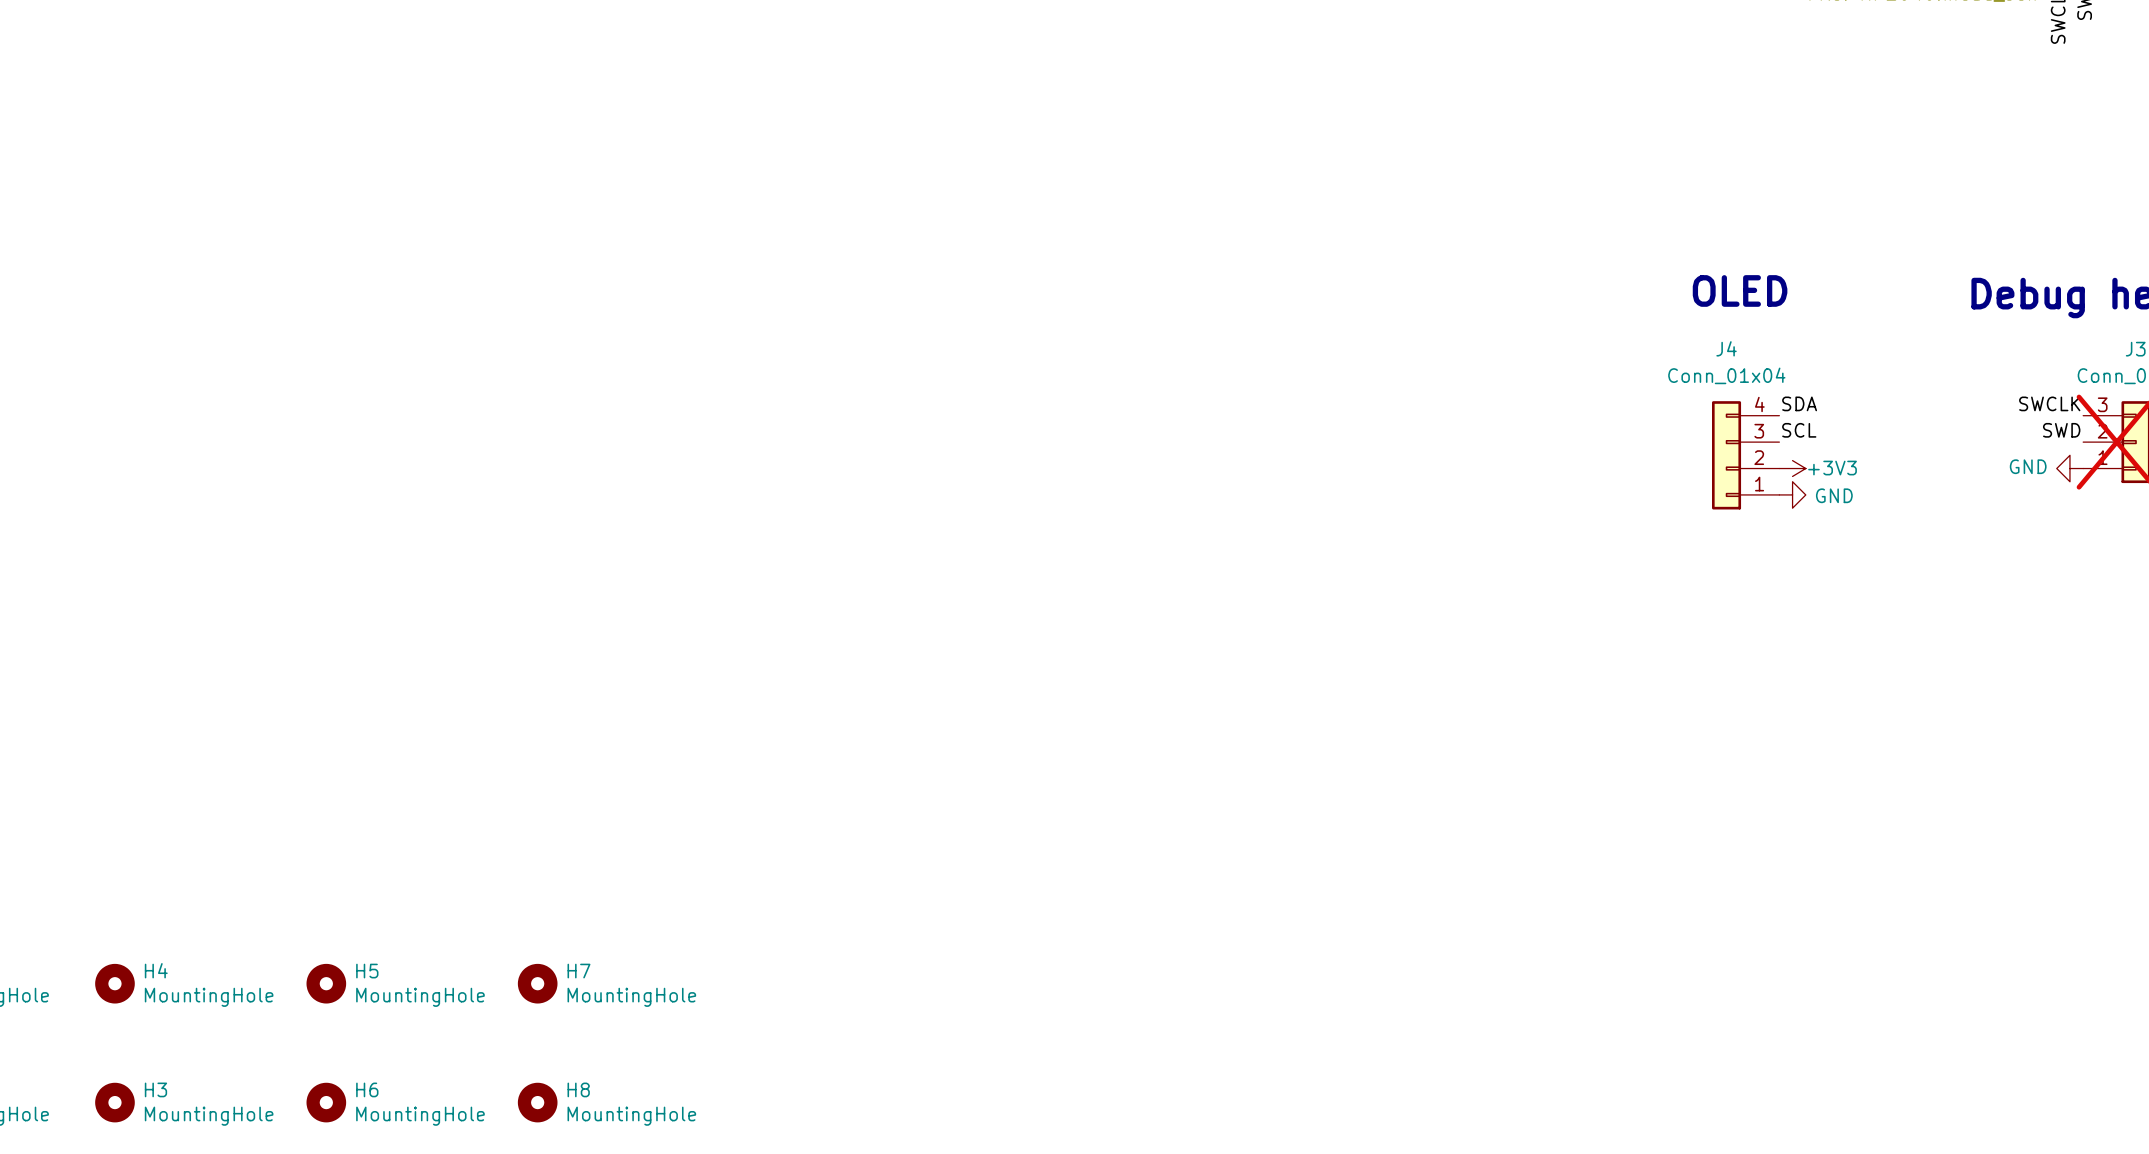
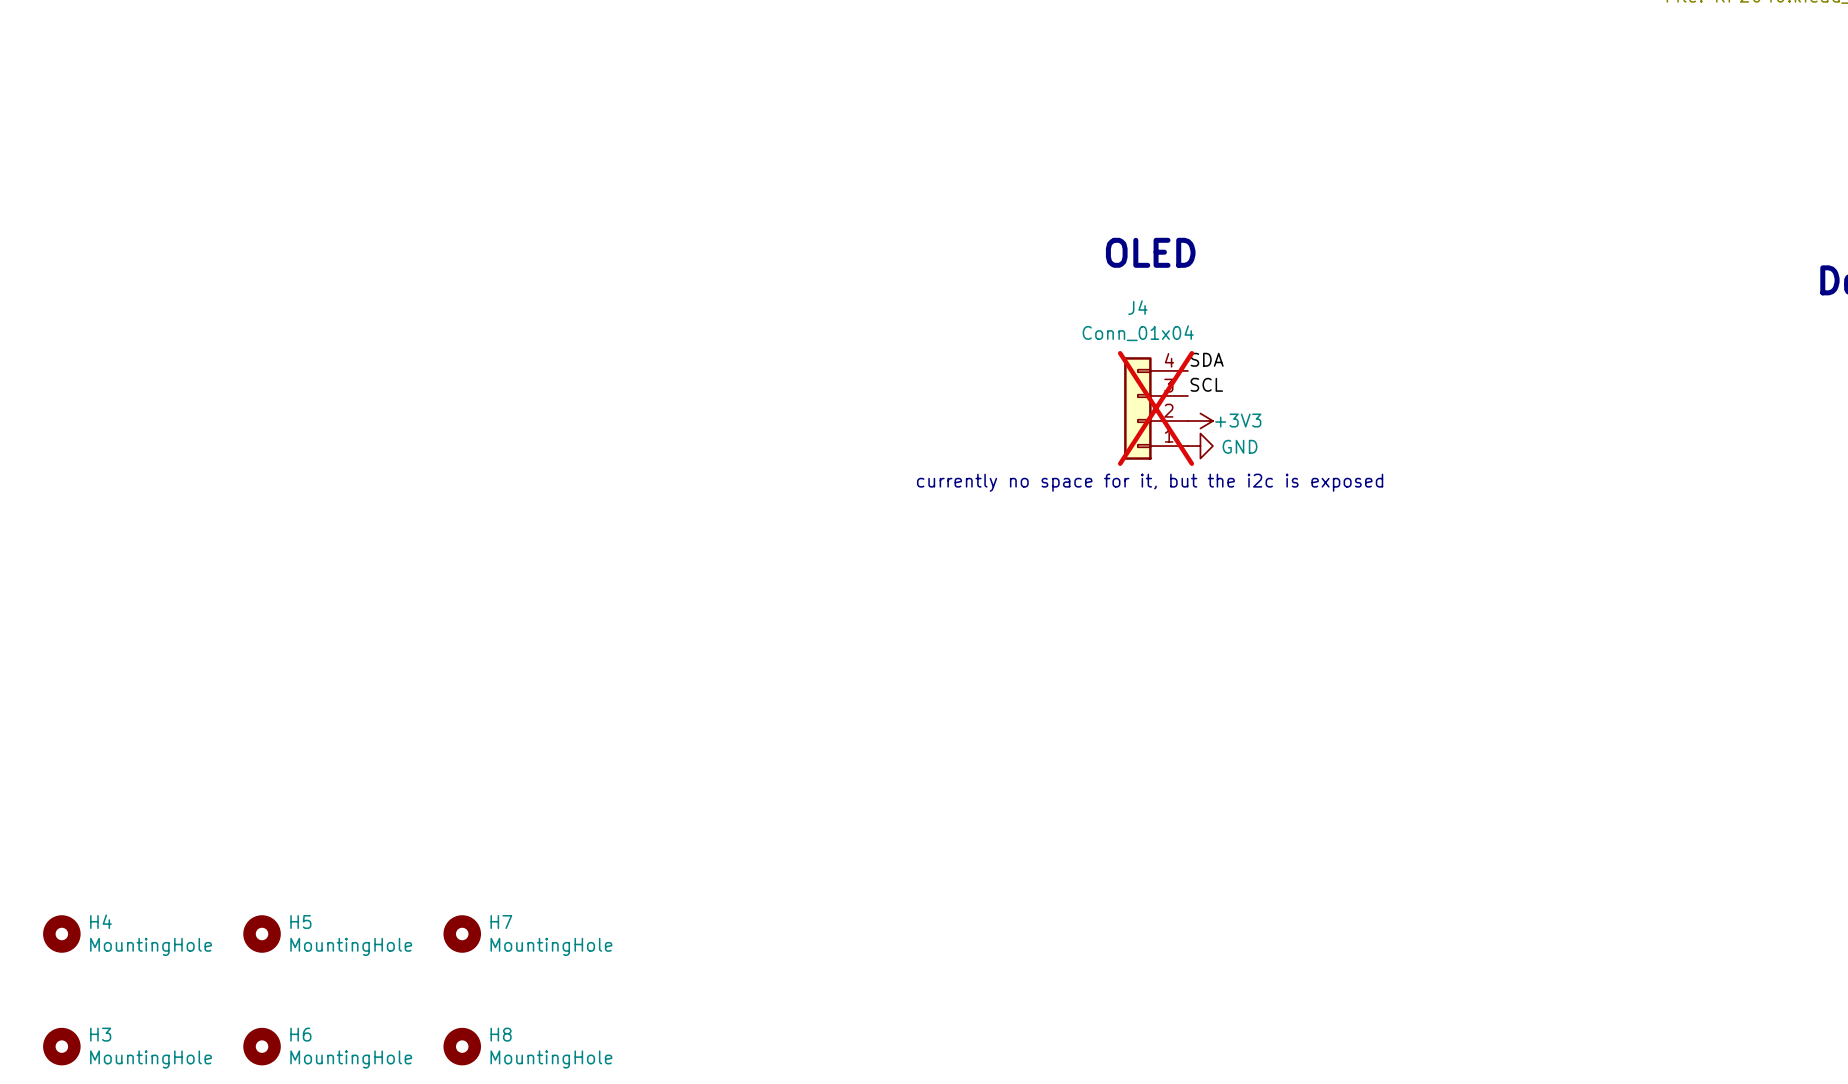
text: none -> OLED (1150, 252)
text: OLED (1740, 290) -> none
label: none -> SDA (1207, 359)
label: none -> SCL (1206, 384)
label: SDA (1799, 403) -> none
J4 do-not-place cross: none -> (1156, 408)
label: SCL (1799, 430) -> none
power symbol: none -> +3V3 (1200, 421)
J4 position: (1745, 455) -> (1156, 408)
power symbol: none -> GND (1200, 446)
power symbol: +3V3 (1792, 468) -> none
power symbol: GND (1792, 494) -> none
text: none -> currently no space for it, but the i2c is exposed (1150, 482)

